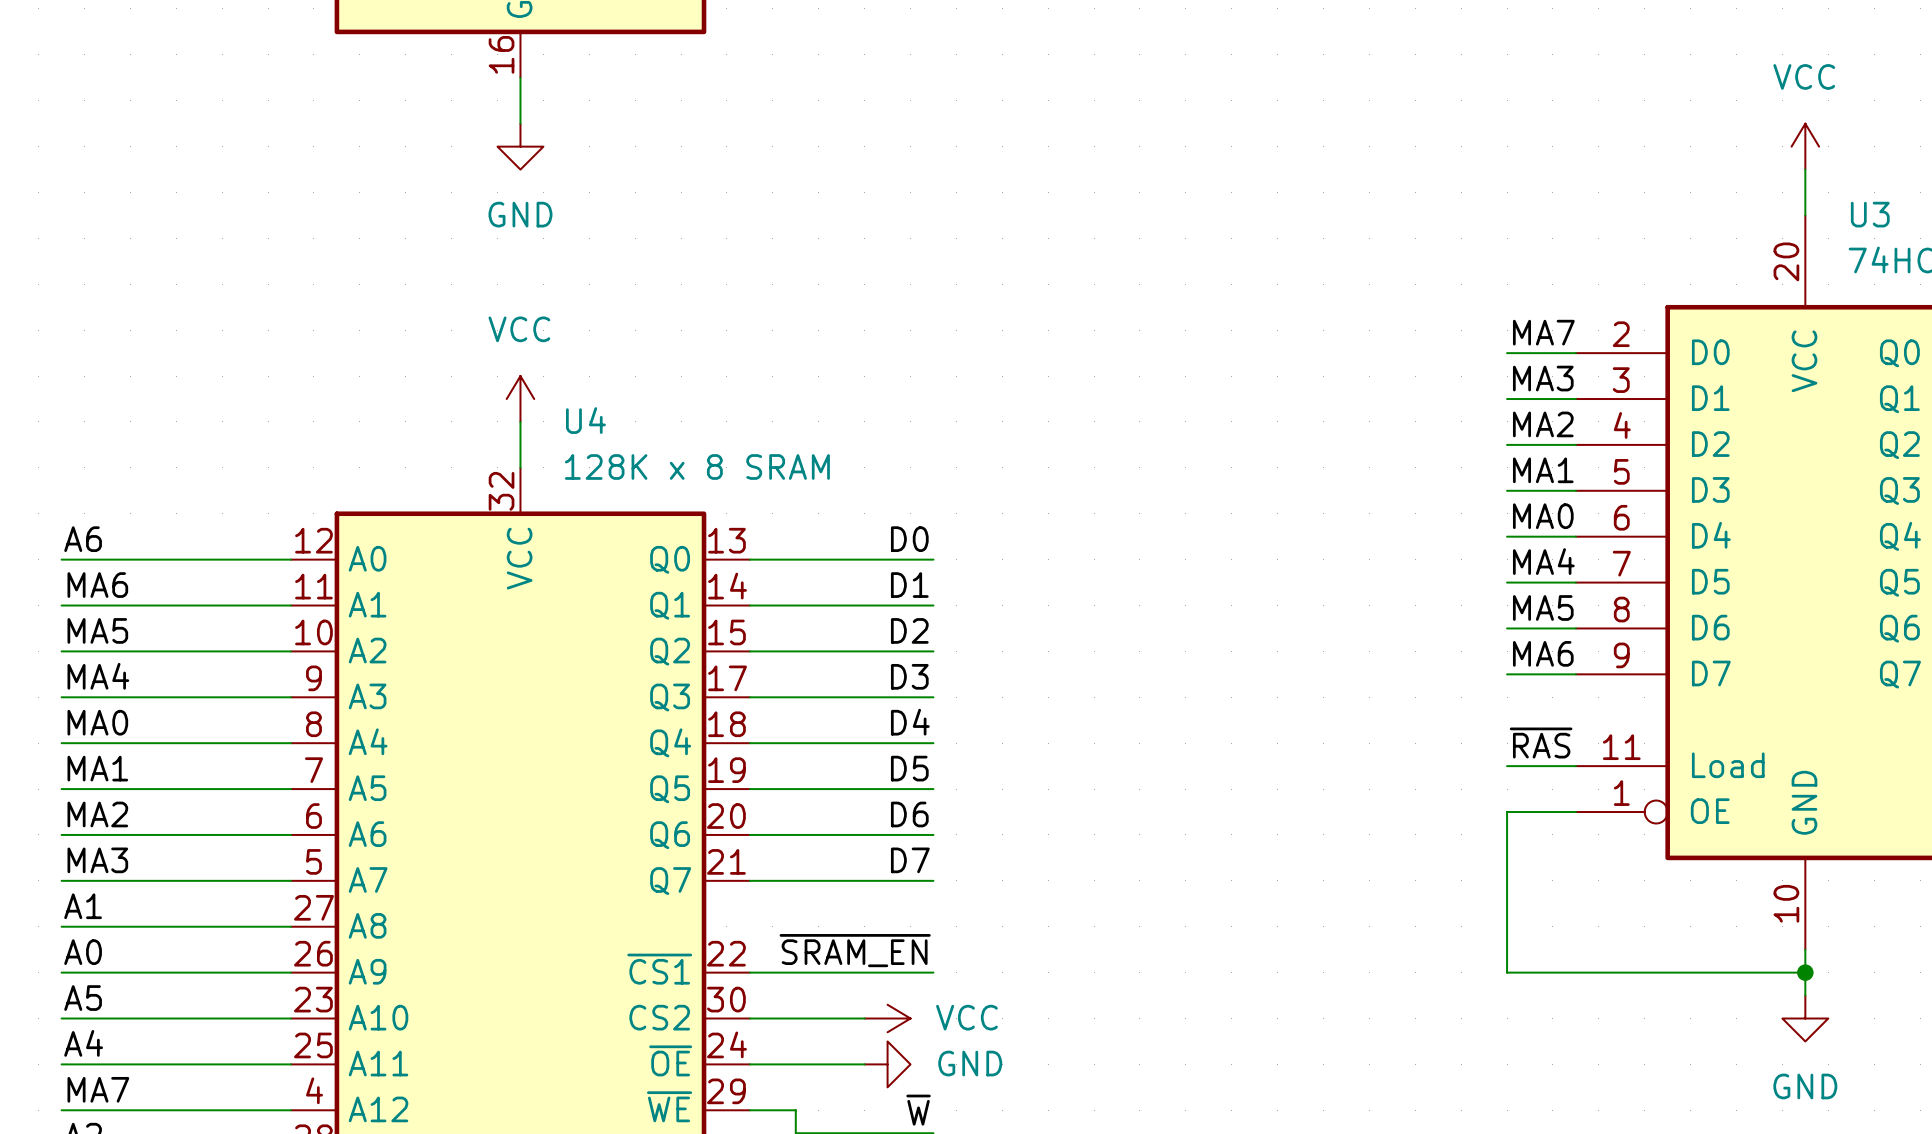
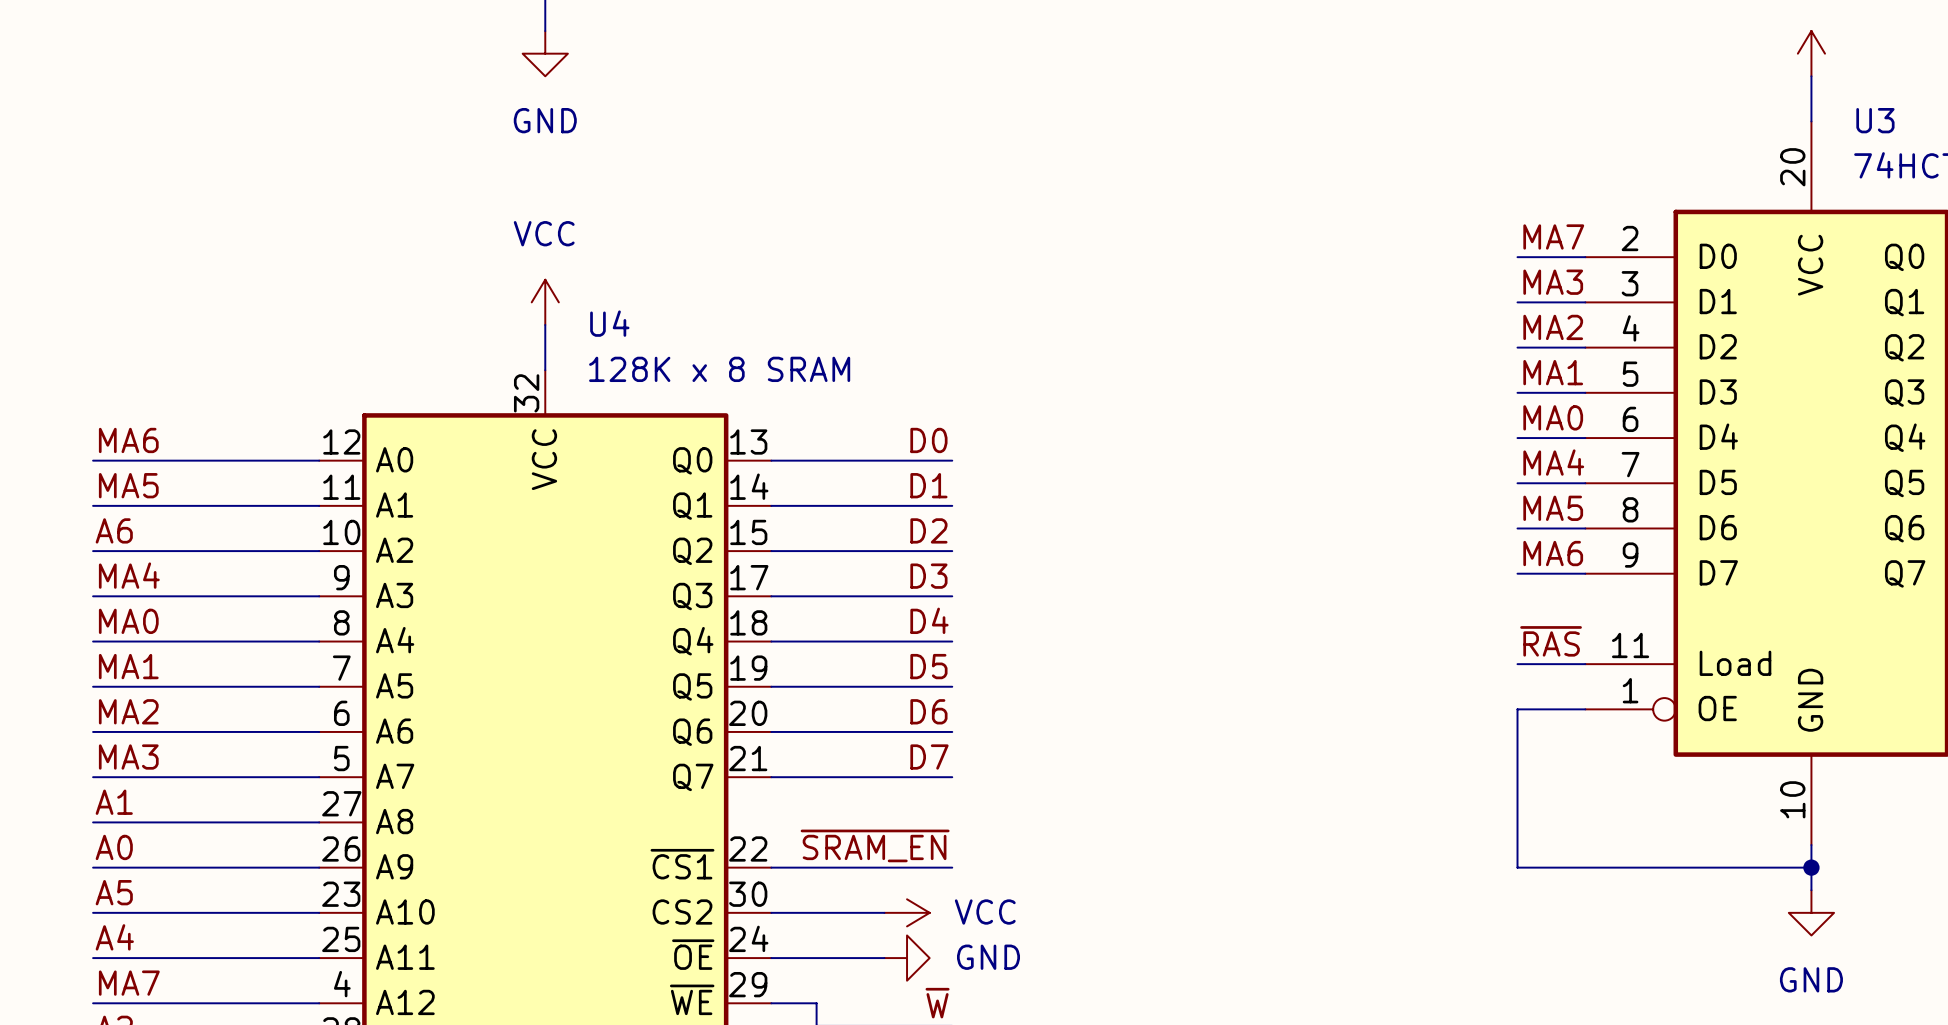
label: A6 (83, 539) -> MA6 (128, 440)
label: MA6 (97, 585) -> MA5 (128, 485)
label: MA5 (97, 630) -> A6 (114, 530)

